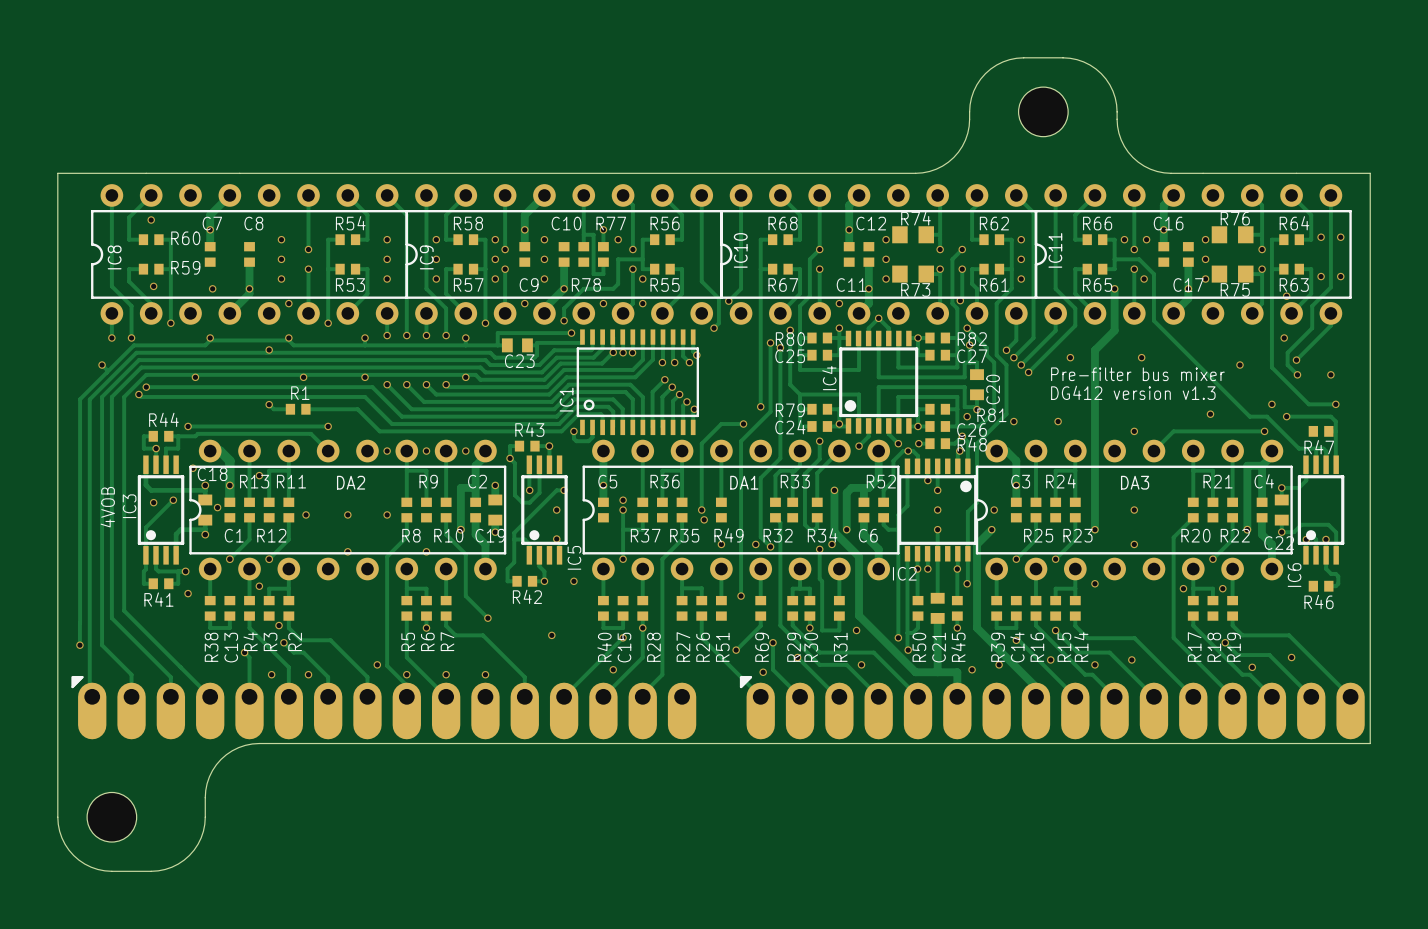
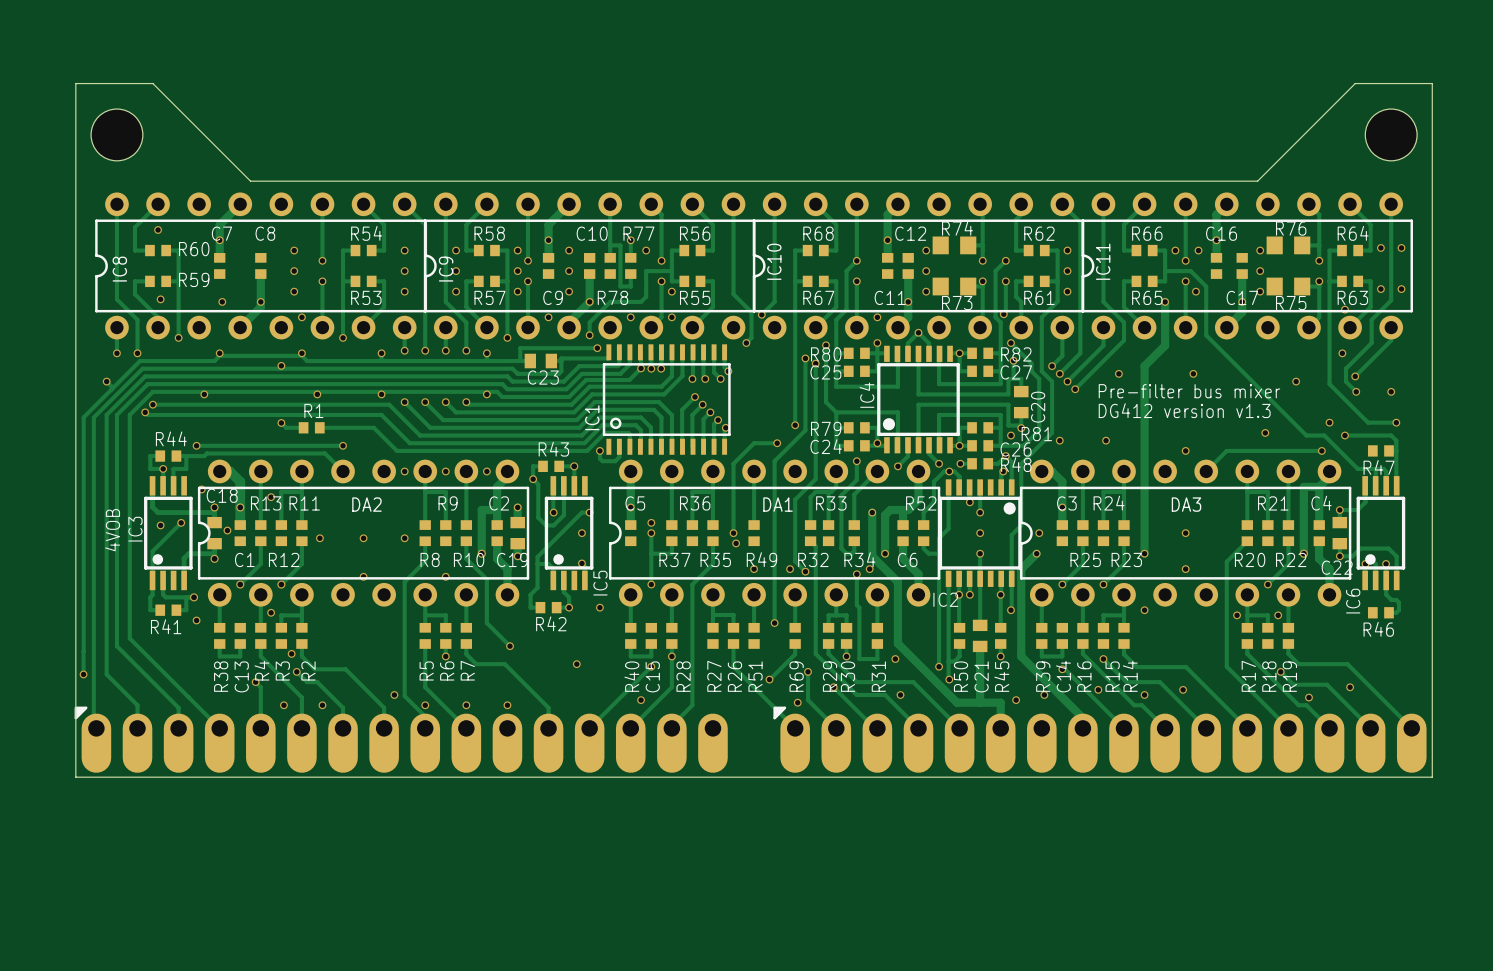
hole position: (1043, 111) -> (1391, 134)
hole: none -> (116, 134)
board edge: (239, 173) (57, 173) (57, 817) (59, 831) (65, 844) (78, 860) (91, 867) (104, 870) (158, 870) (178, 864) (189, 855) (201, 837) (204, 824) (207, 783) (216, 764) (232, 750) (245, 745) (259, 743) -> (250, 181) (152, 83) (75, 83) (75, 777) (271, 777)
board edge: (915, 173) (929, 171) (942, 166) (958, 152) (967, 133) (970, 104) (973, 91) (985, 73) (1003, 61) (1023, 57) (1070, 58) (1083, 61) (1095, 68) (1105, 78) (1112, 91) (1116, 104) (1118, 133) (1128, 152) (1144, 166) (1157, 171) (1171, 173) -> (957, 181) (1224, 181)
board edge: (1203, 173) (1370, 173) -> (1257, 181) (1355, 83) (1432, 83) (1432, 181)
hole: (111, 817) -> none

